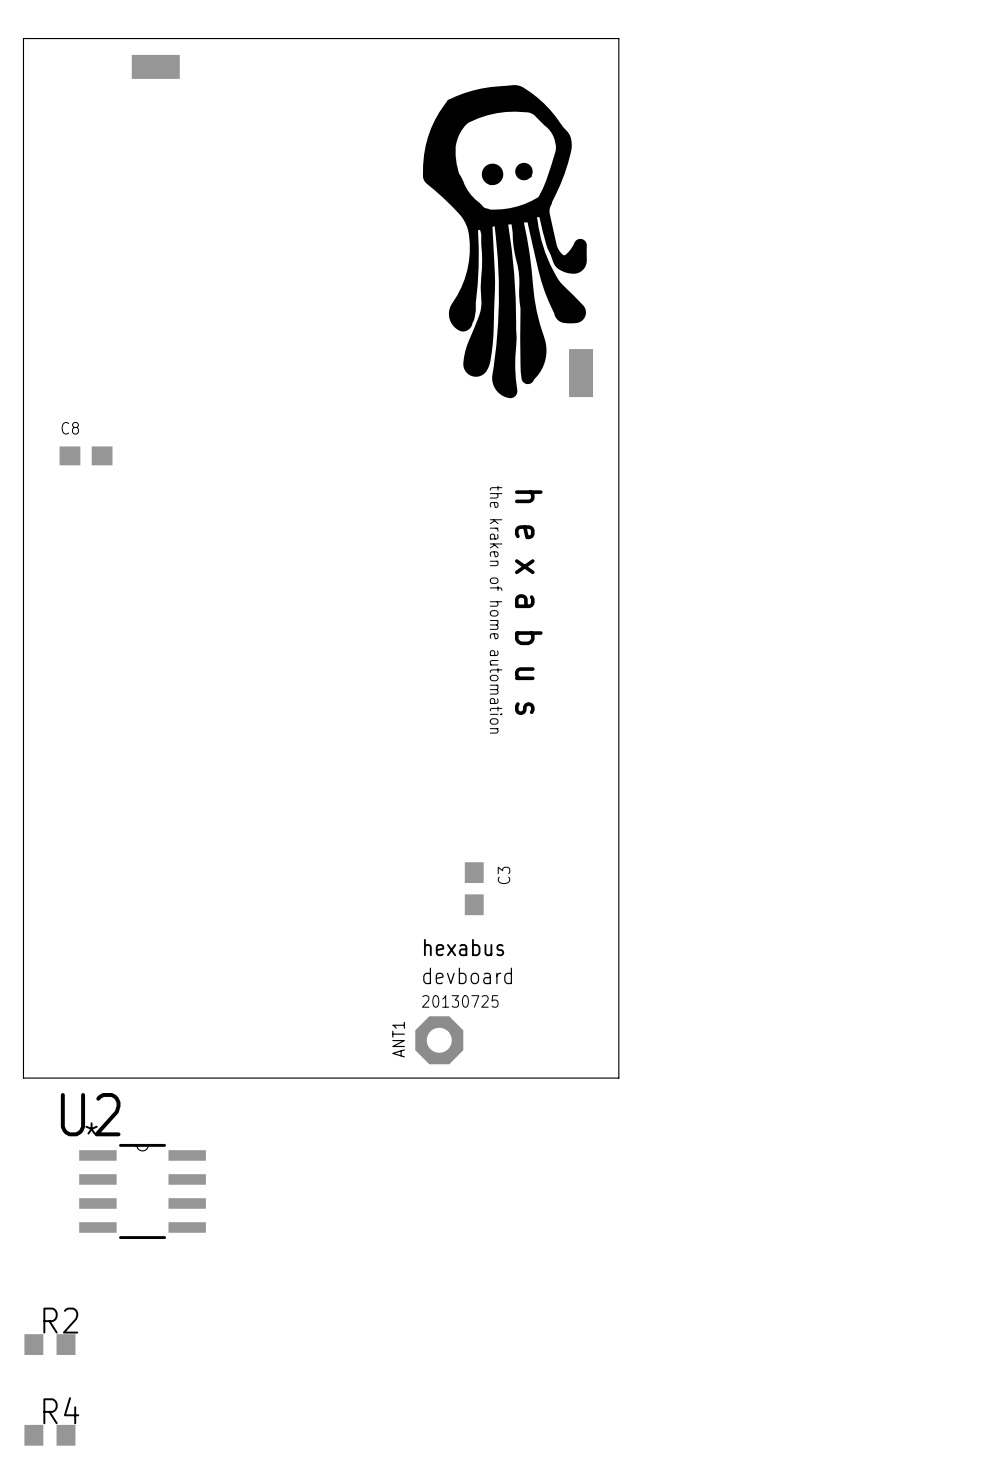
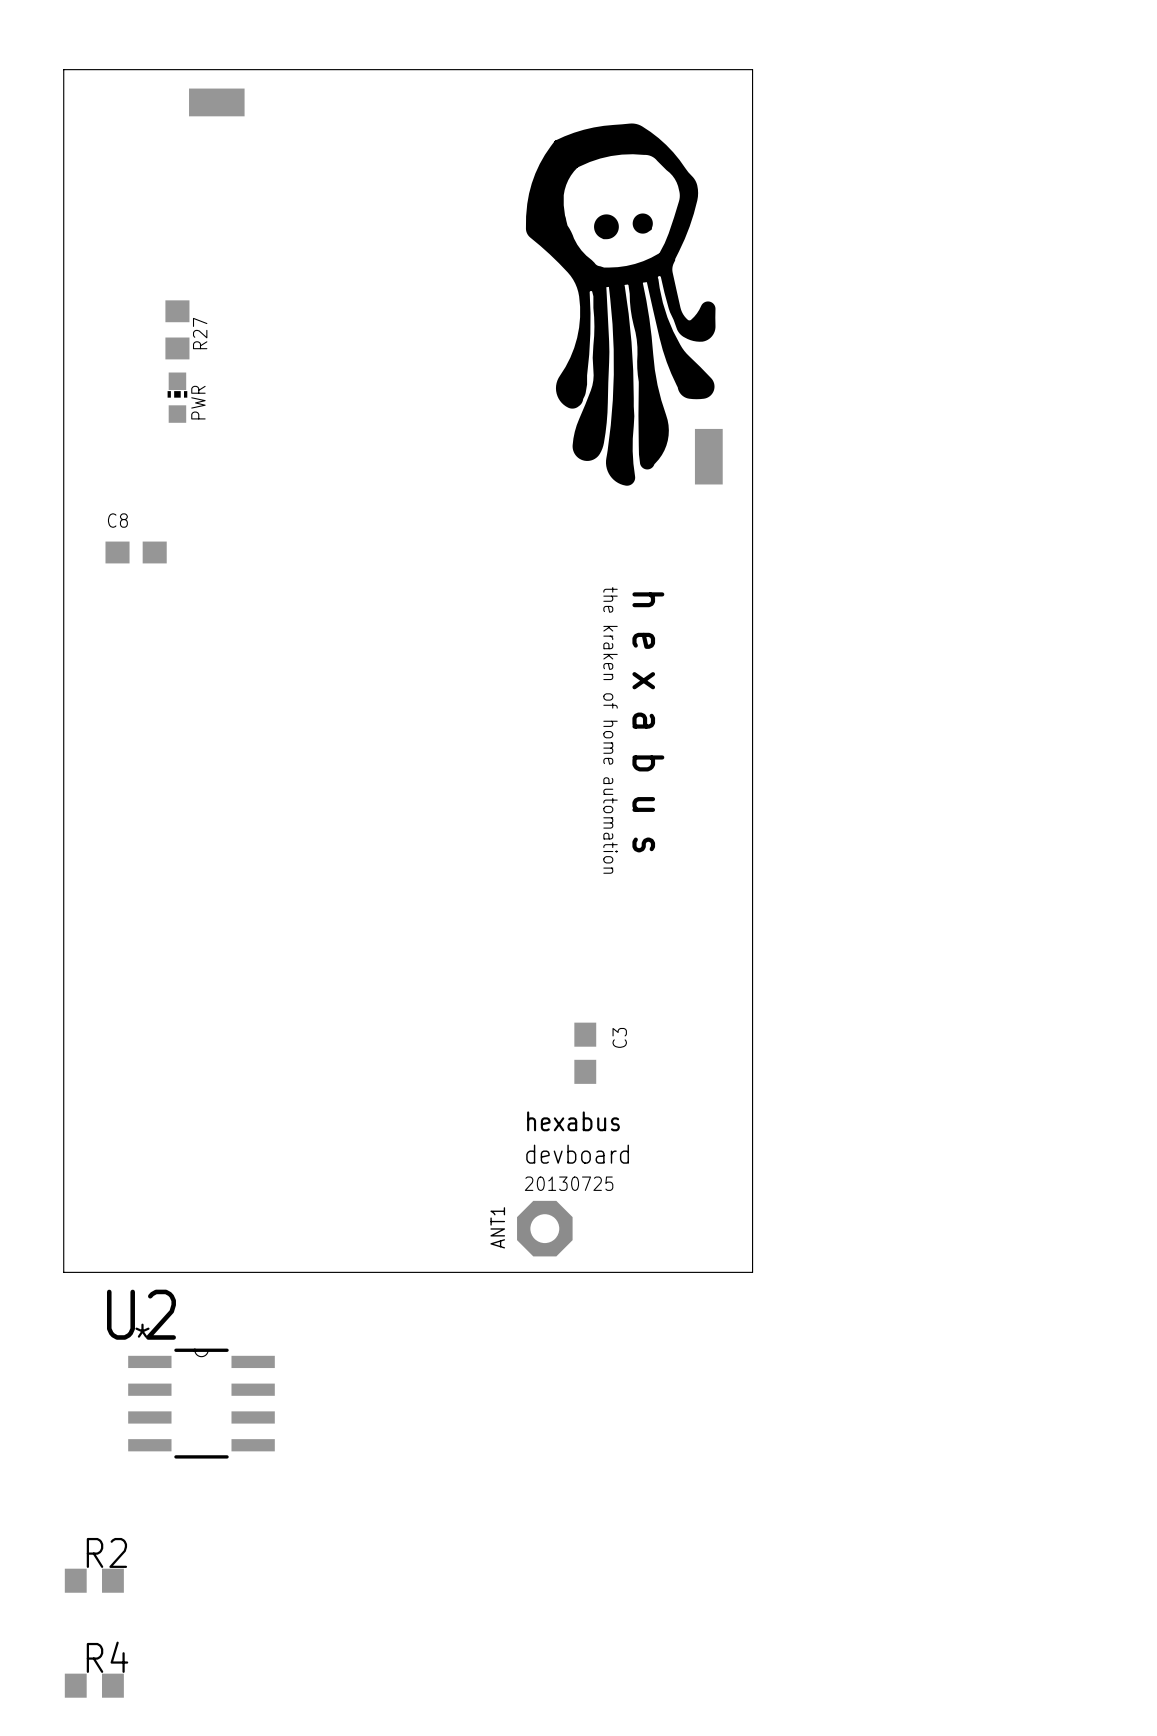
R27: none -> (177, 329)
PWR: none -> (177, 397)

